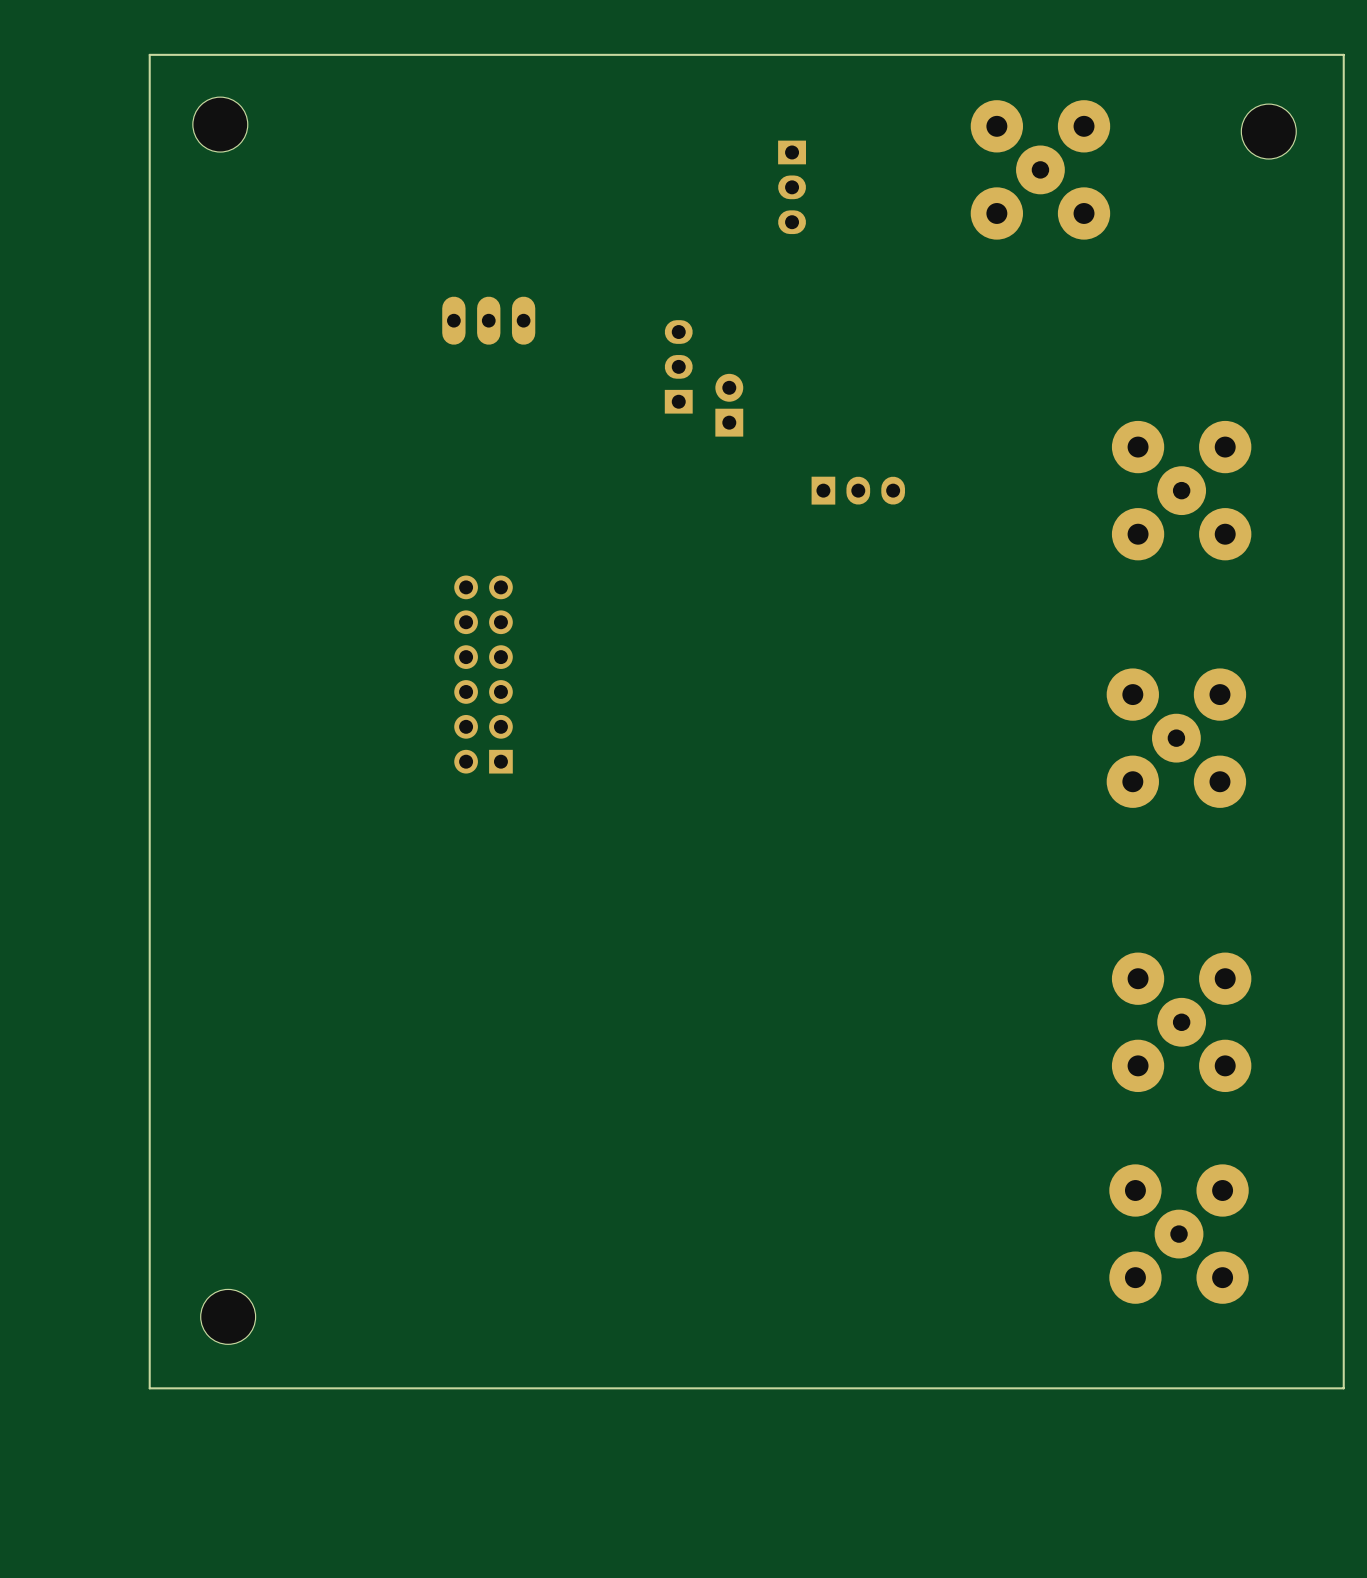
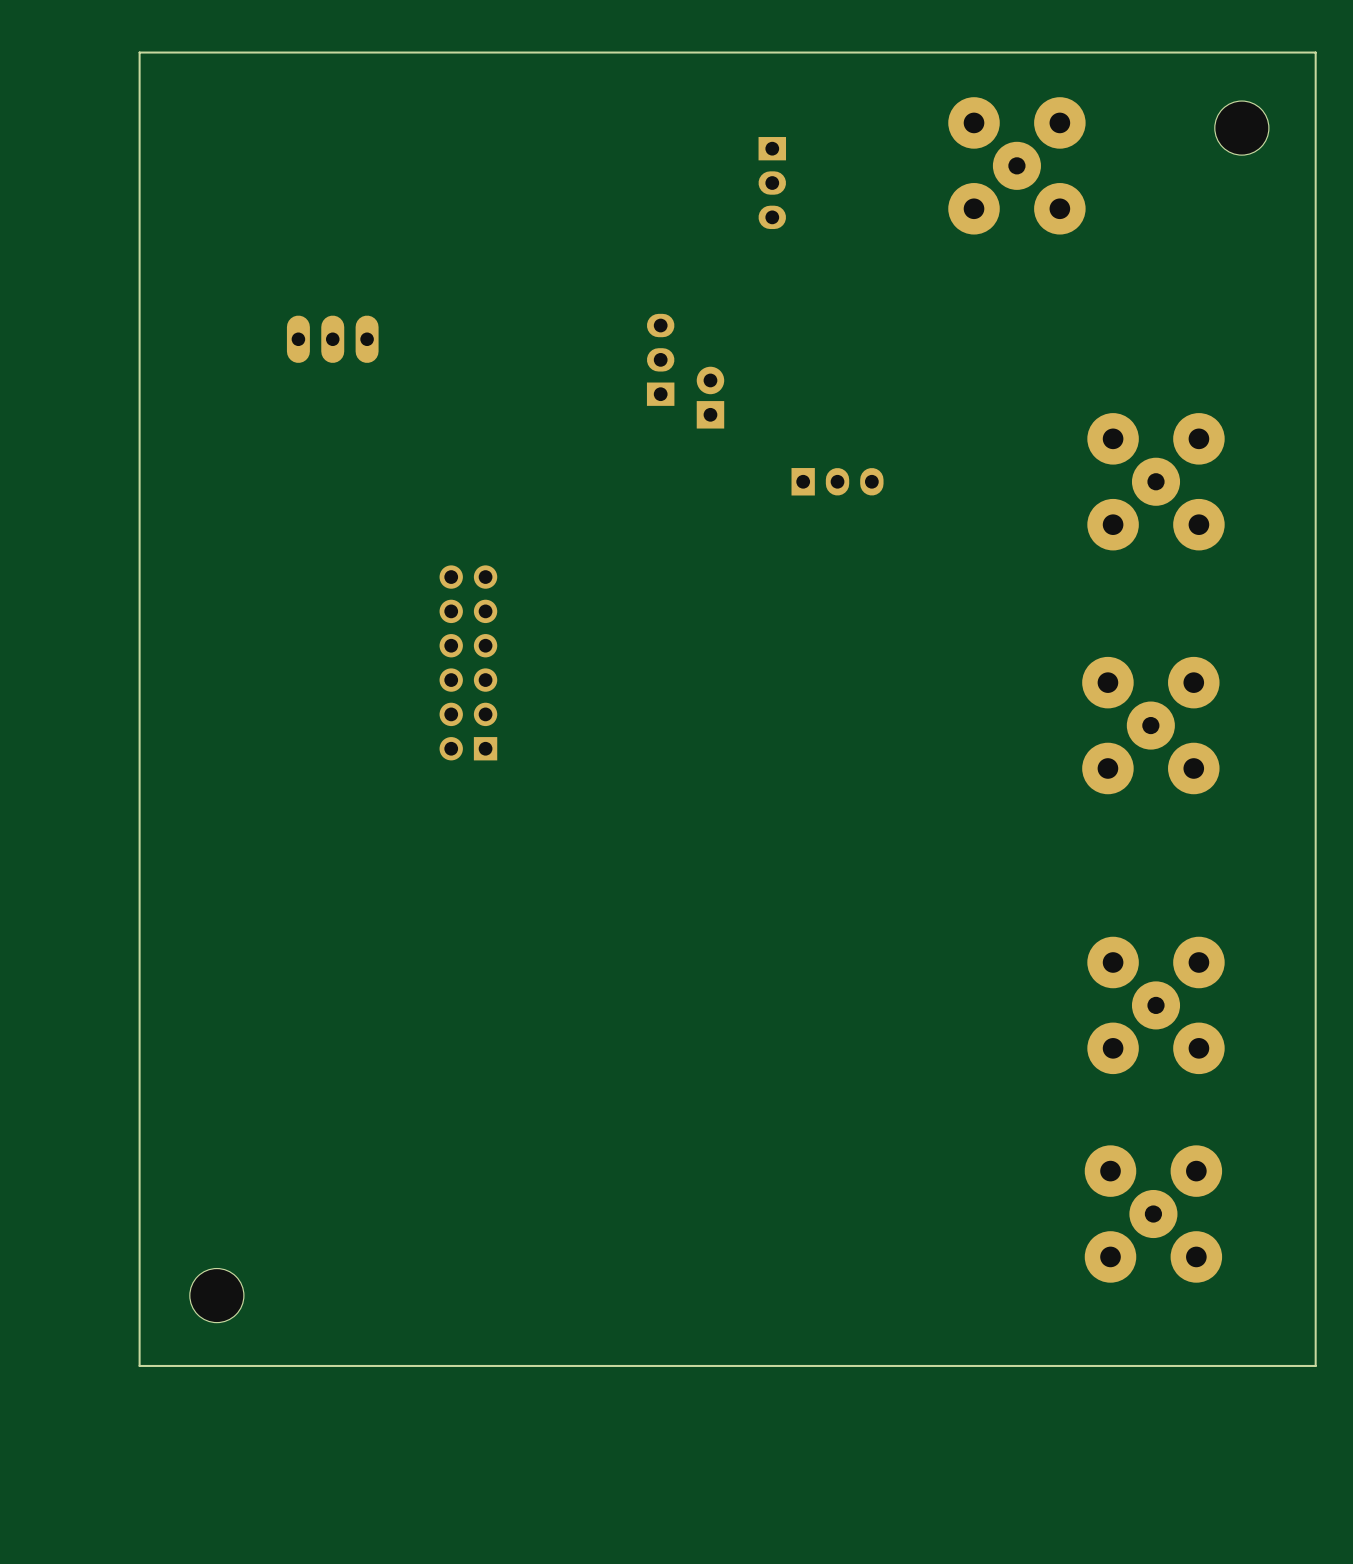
part: (220, 124) -> none
part position: (488, 320) -> (332, 339)

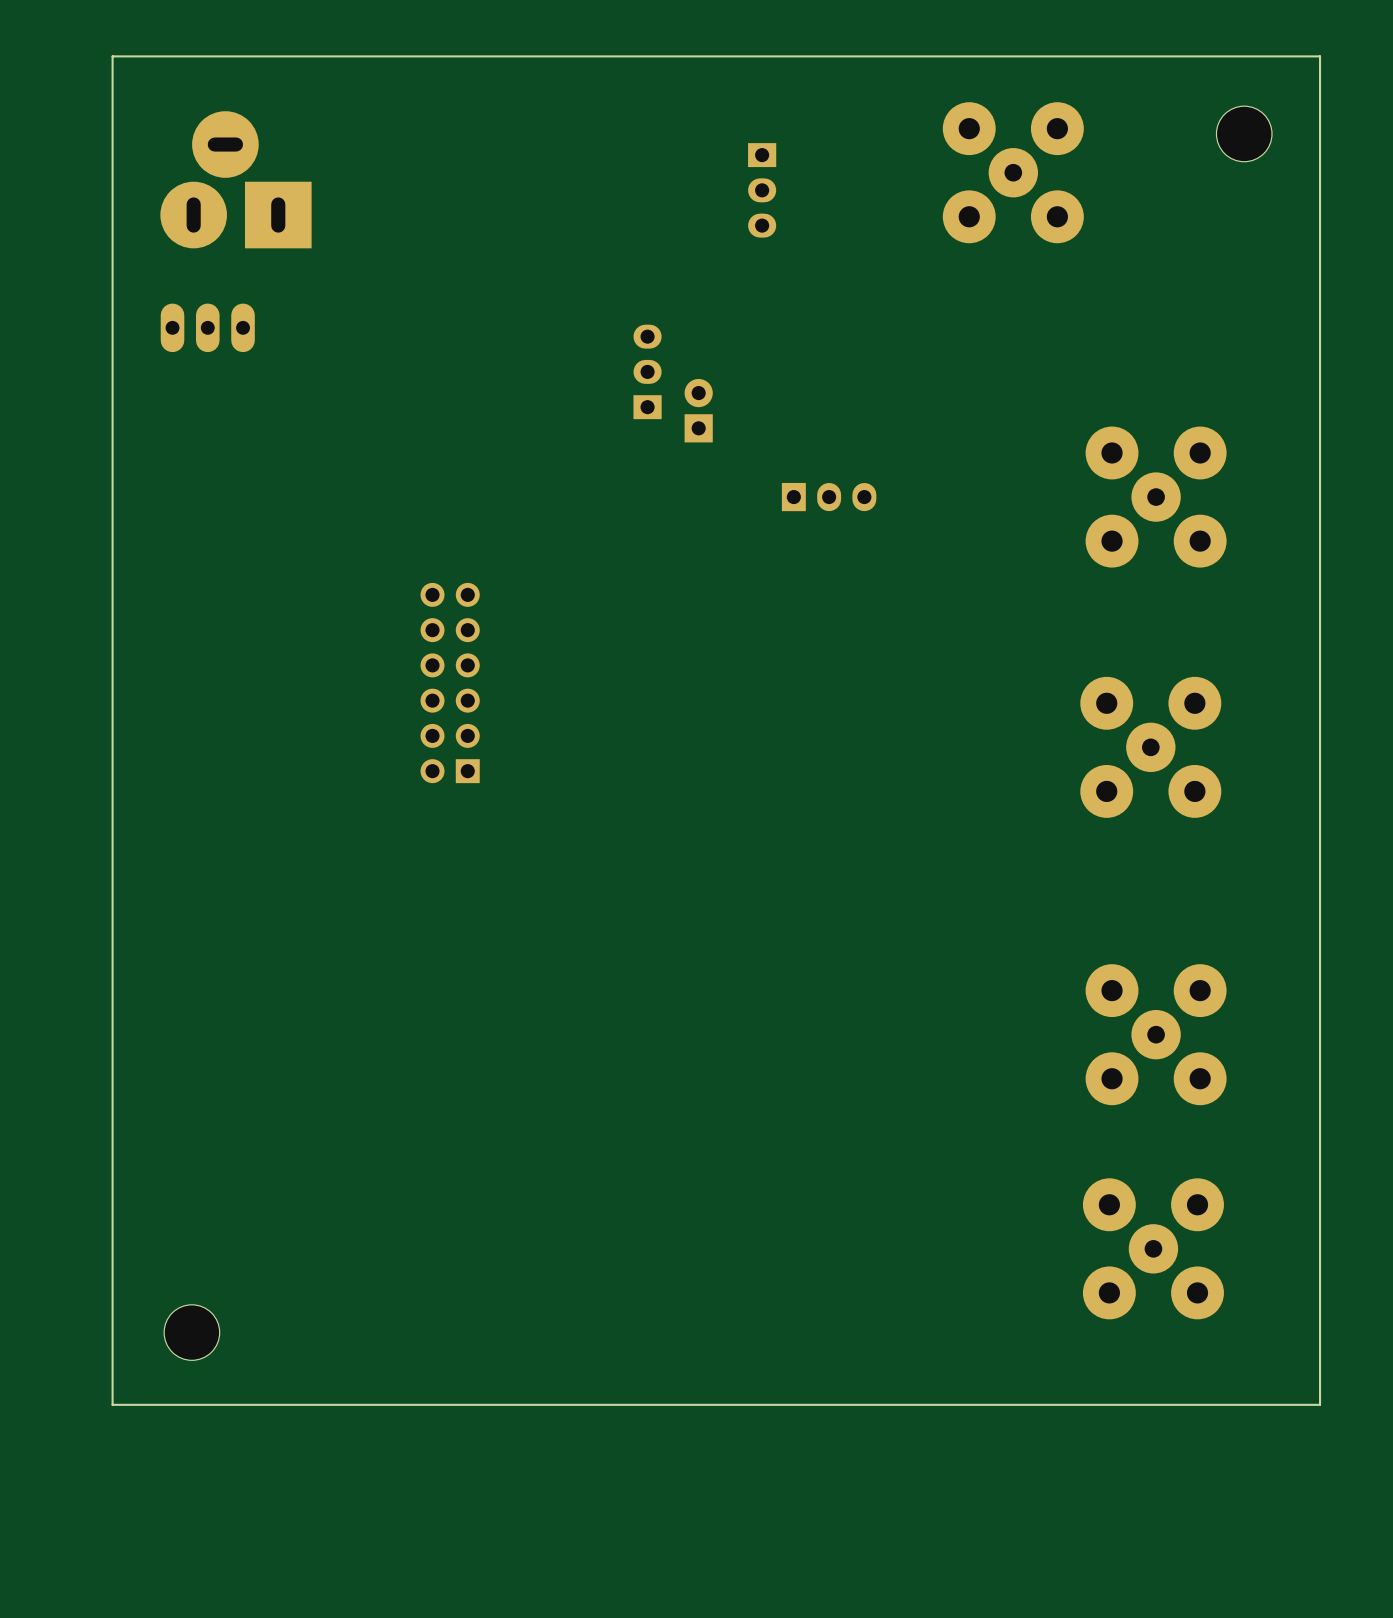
part: none -> (235, 179)
part position: (332, 339) -> (207, 327)

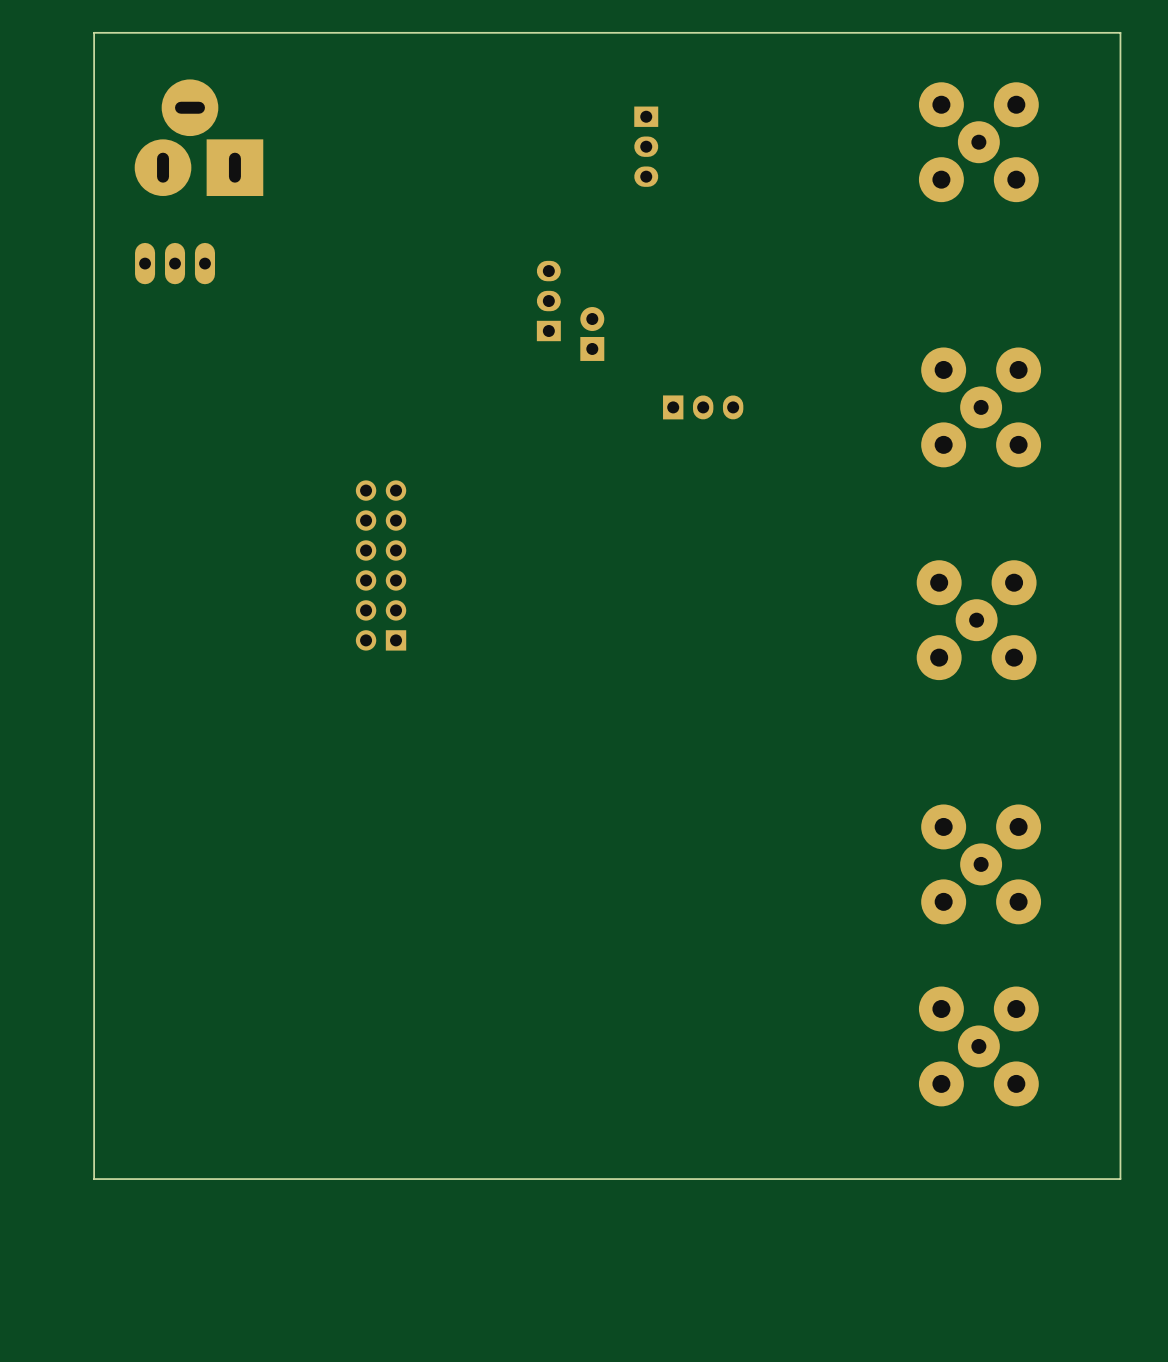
part: (1244, 133) -> none
part position: (1013, 172) -> (978, 142)
part: (191, 1332) -> none

